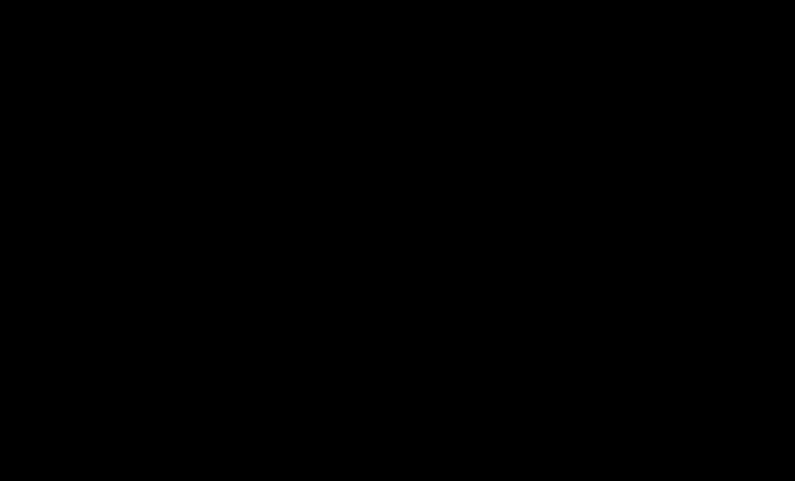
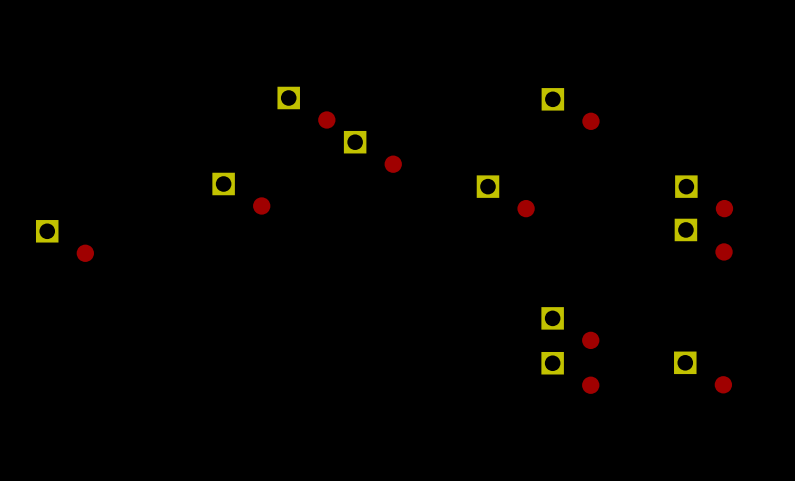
part: none -> (306, 107)
part: none -> (570, 109)
part: none -> (372, 151)
part: none -> (241, 193)
part: none -> (505, 196)
part: none -> (704, 196)
part: none -> (703, 239)
part: none -> (64, 240)
part: none -> (570, 328)
part: none -> (570, 372)
part: none -> (703, 372)

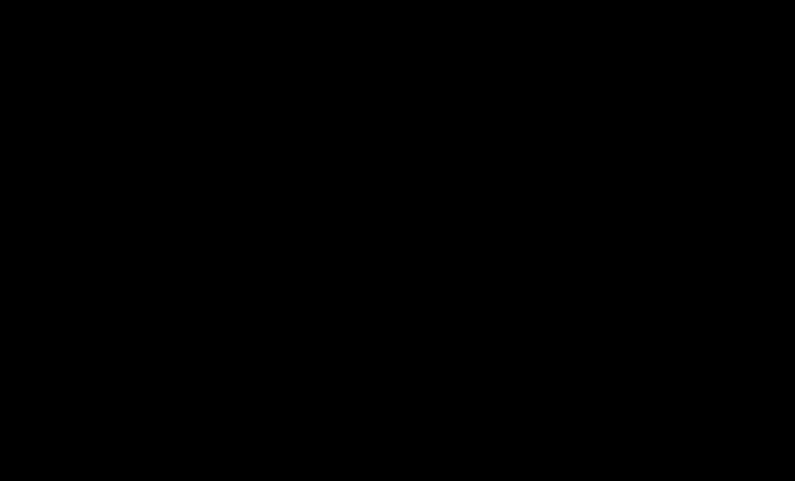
part: (306, 107) -> none
part: (570, 109) -> none
part: (372, 151) -> none
part: (241, 193) -> none
part: (505, 196) -> none
part: (704, 196) -> none
part: (703, 239) -> none
part: (64, 240) -> none
part: (570, 328) -> none
part: (570, 372) -> none
part: (703, 372) -> none

